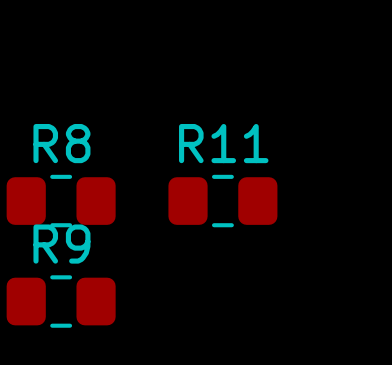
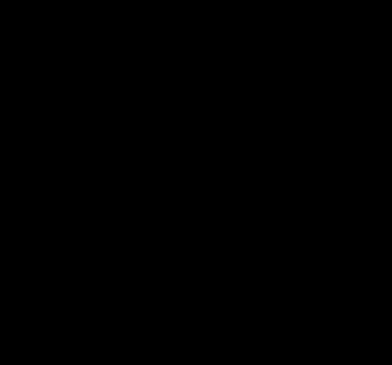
R8: (61, 201) -> none
R11: (222, 201) -> none
R9: (61, 301) -> none

